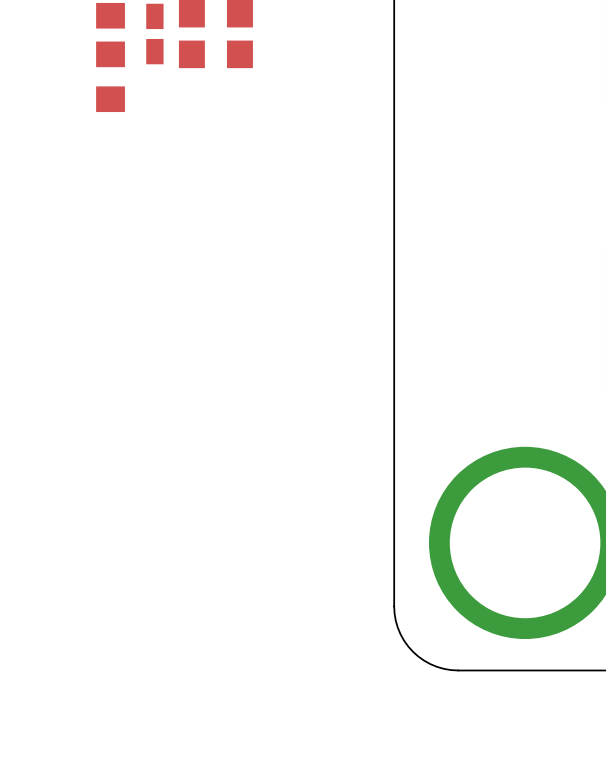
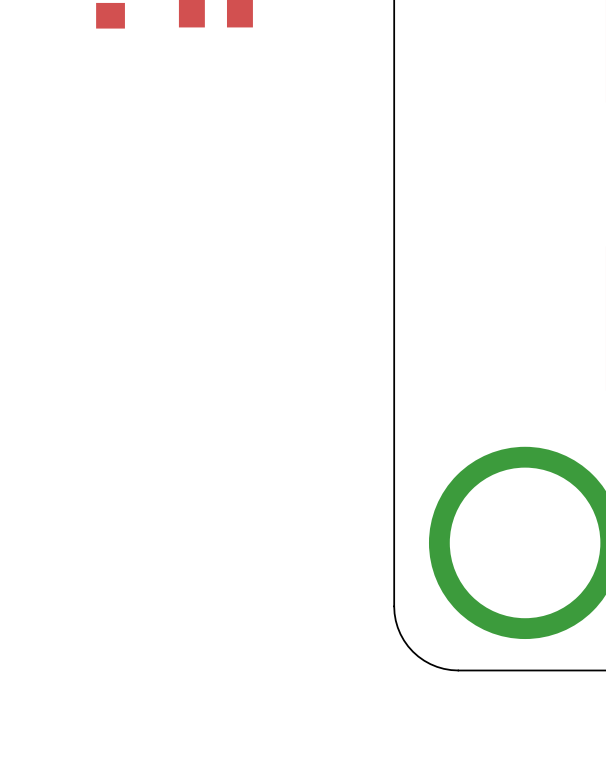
part: (154, 34) -> none
part: (215, 54) -> none
part: (110, 76) -> none

